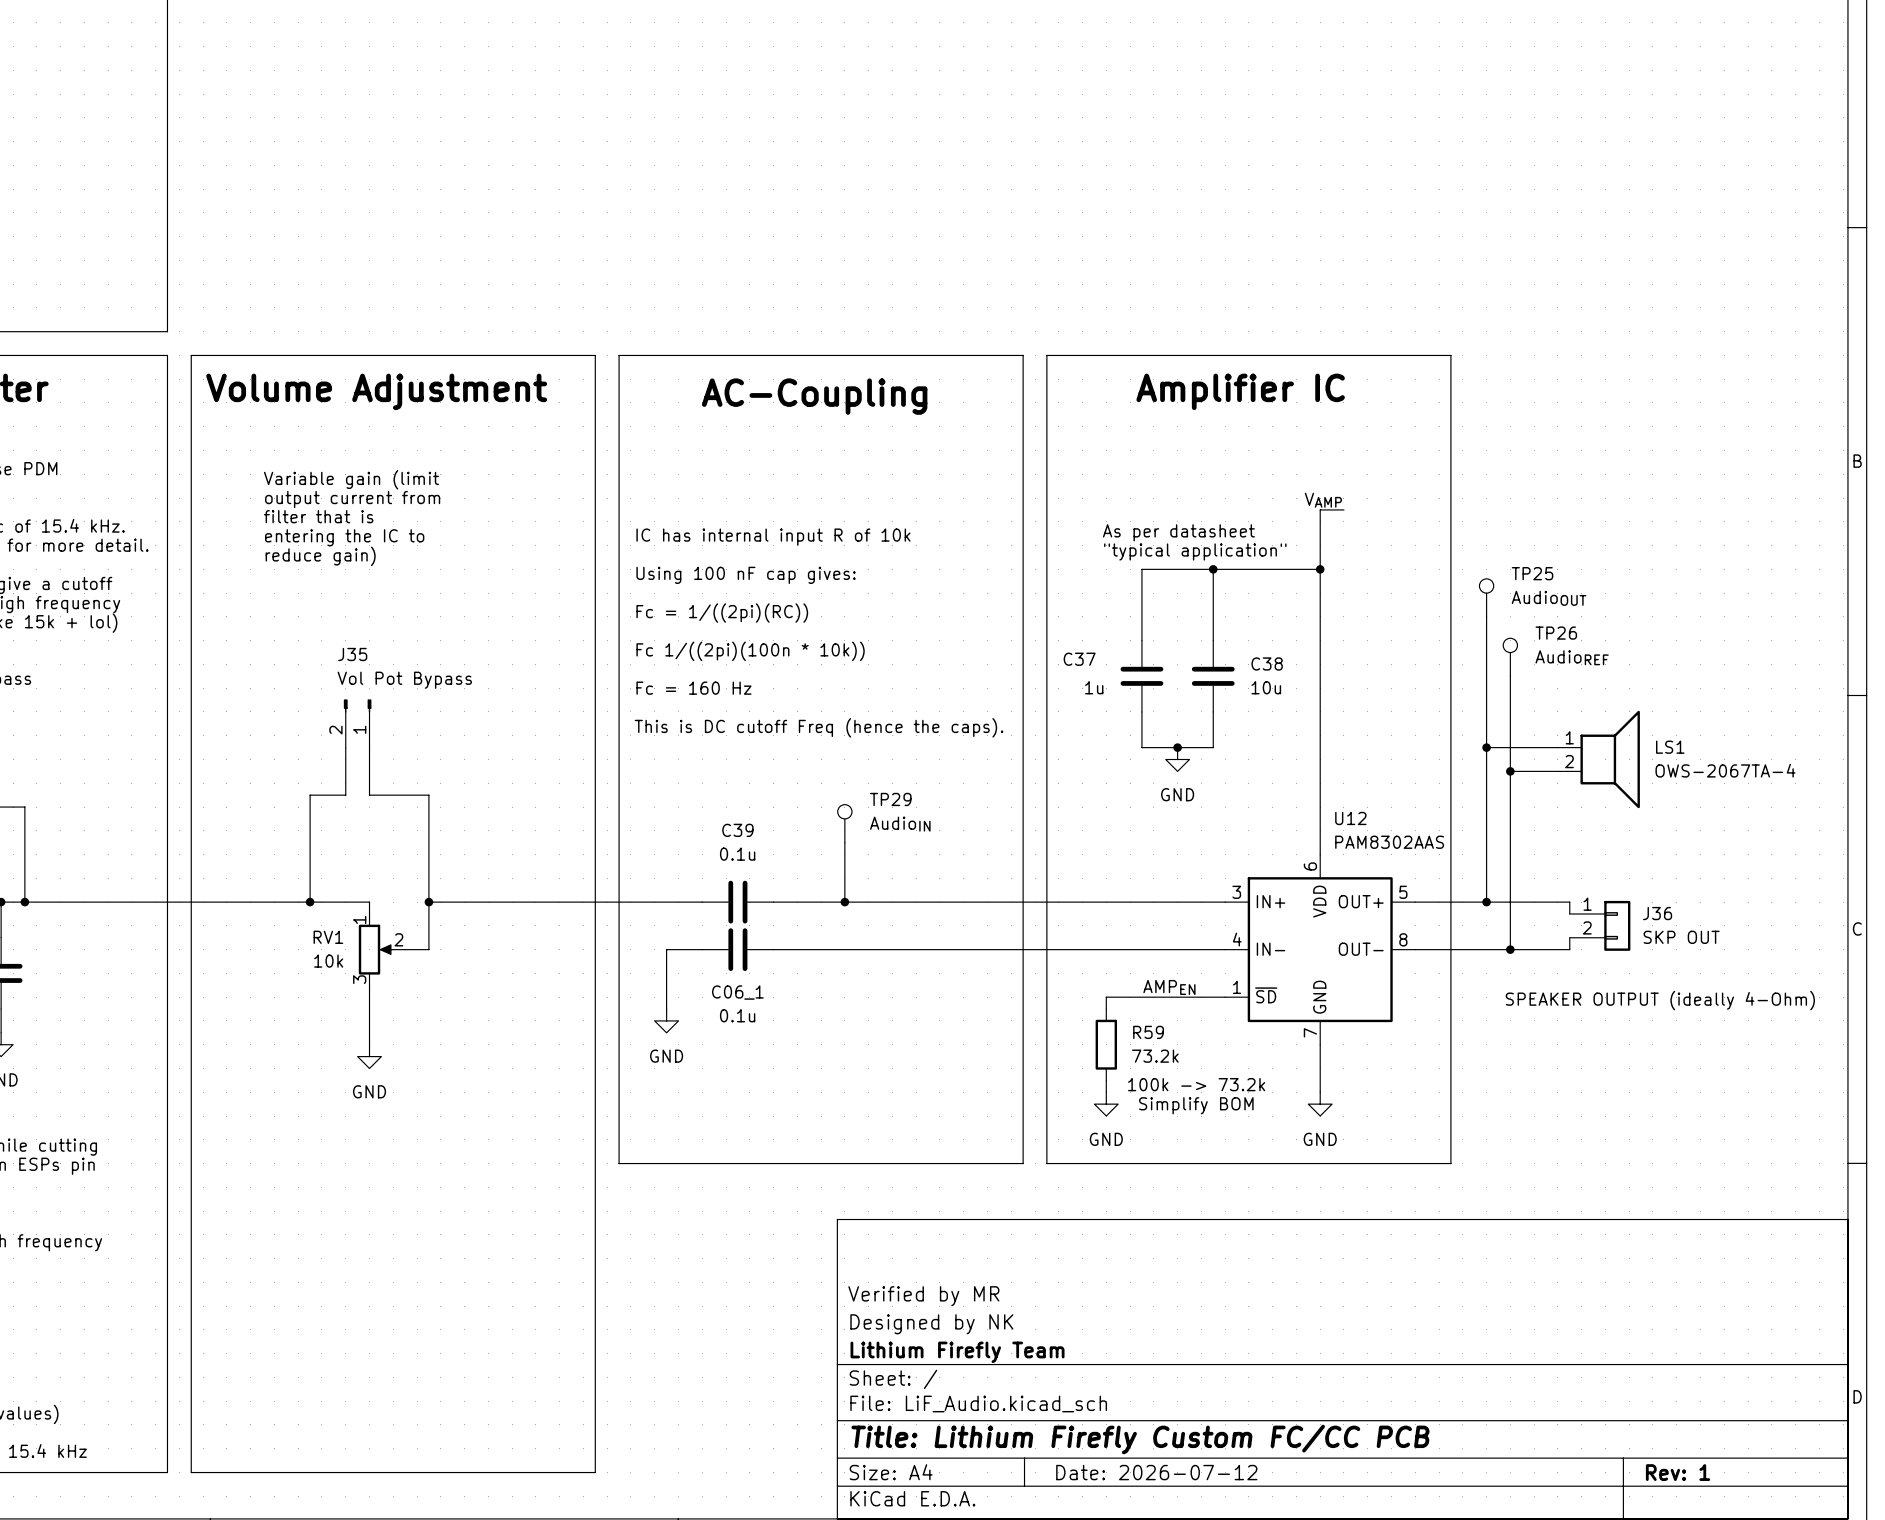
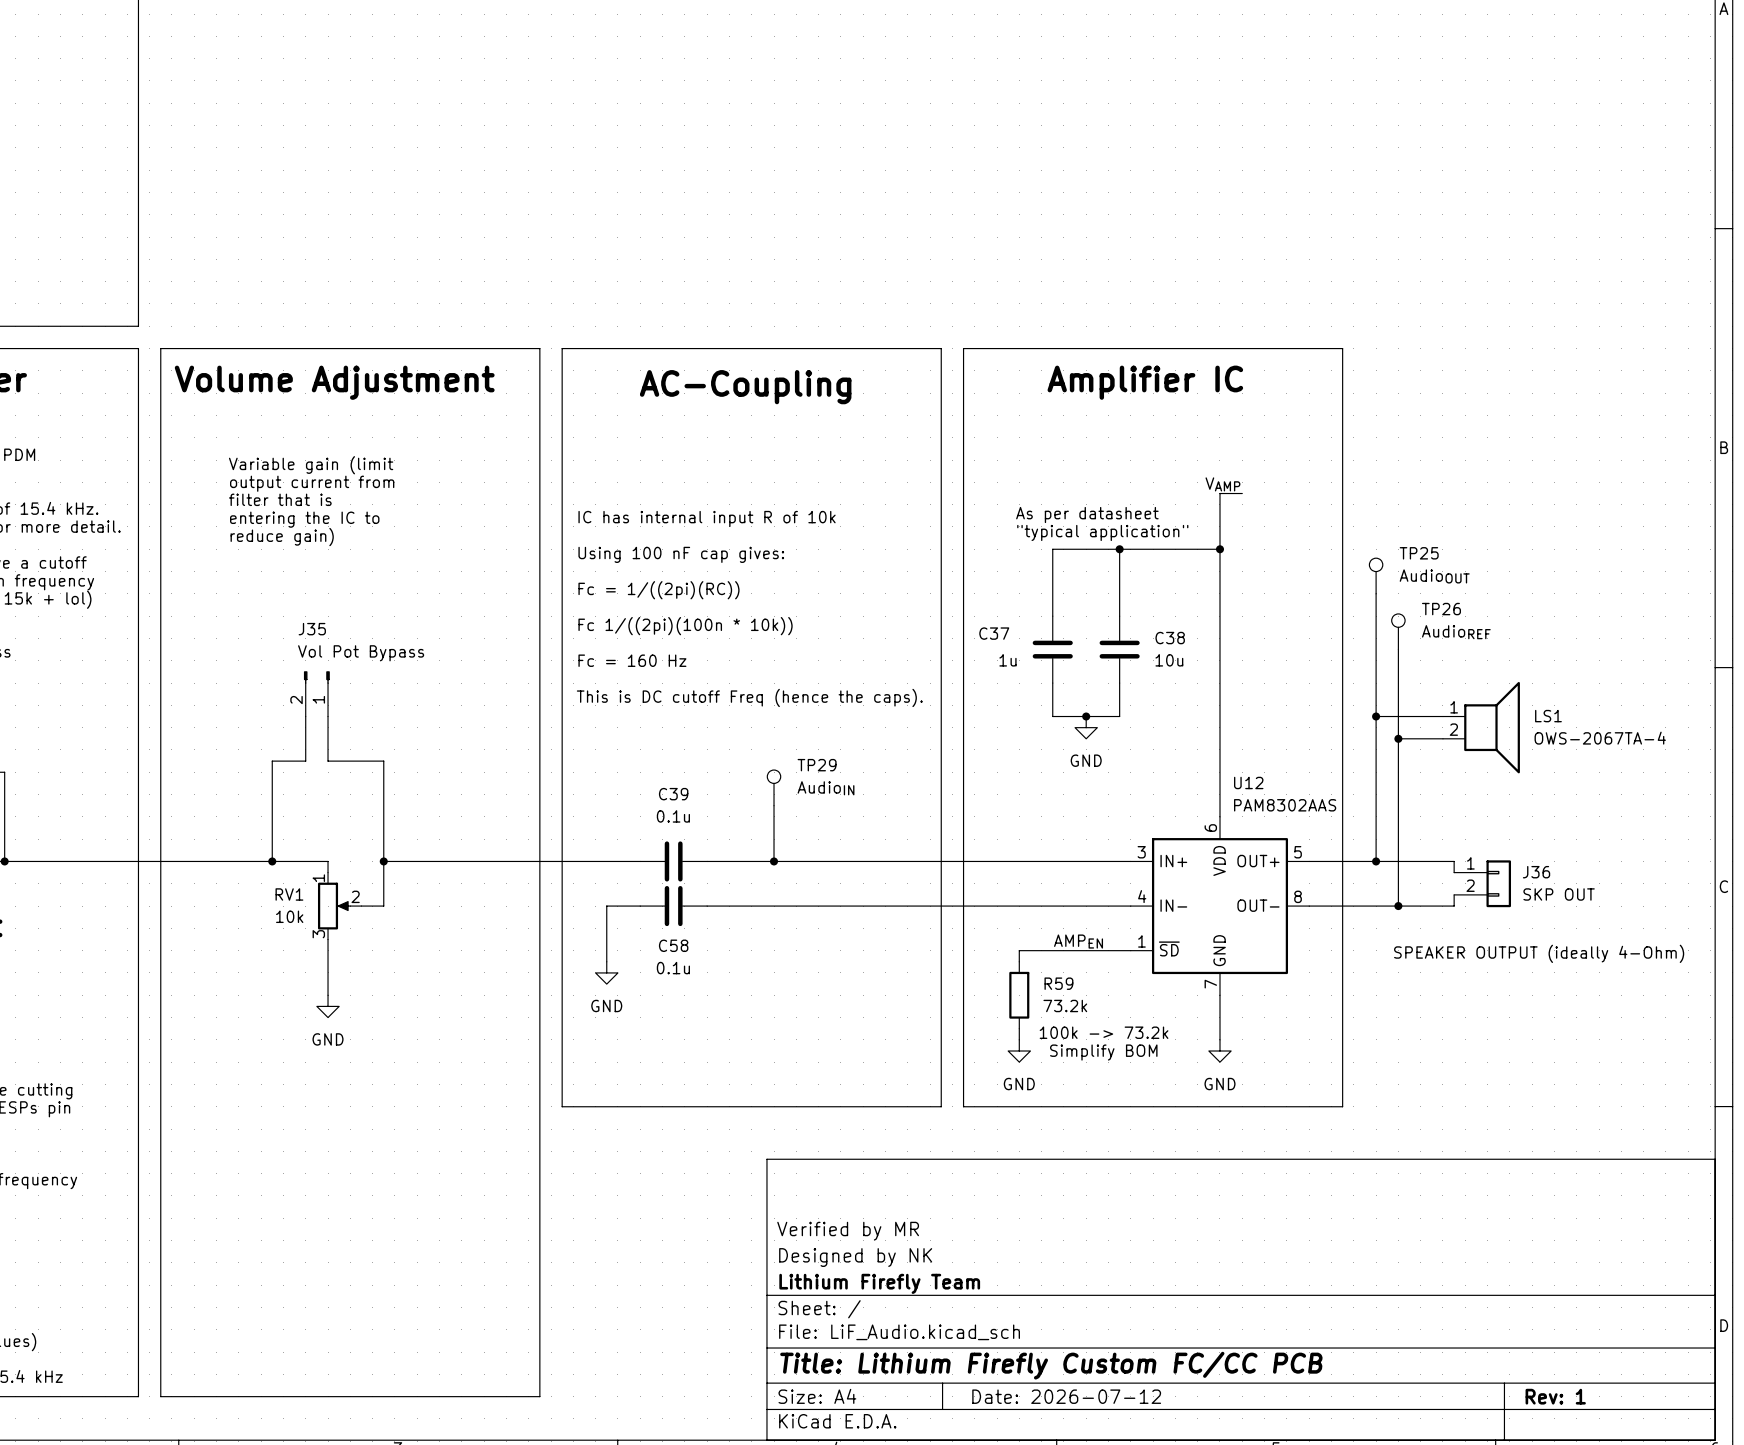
C06_1 name: C06_1 (737, 992) -> C58 (673, 945)

